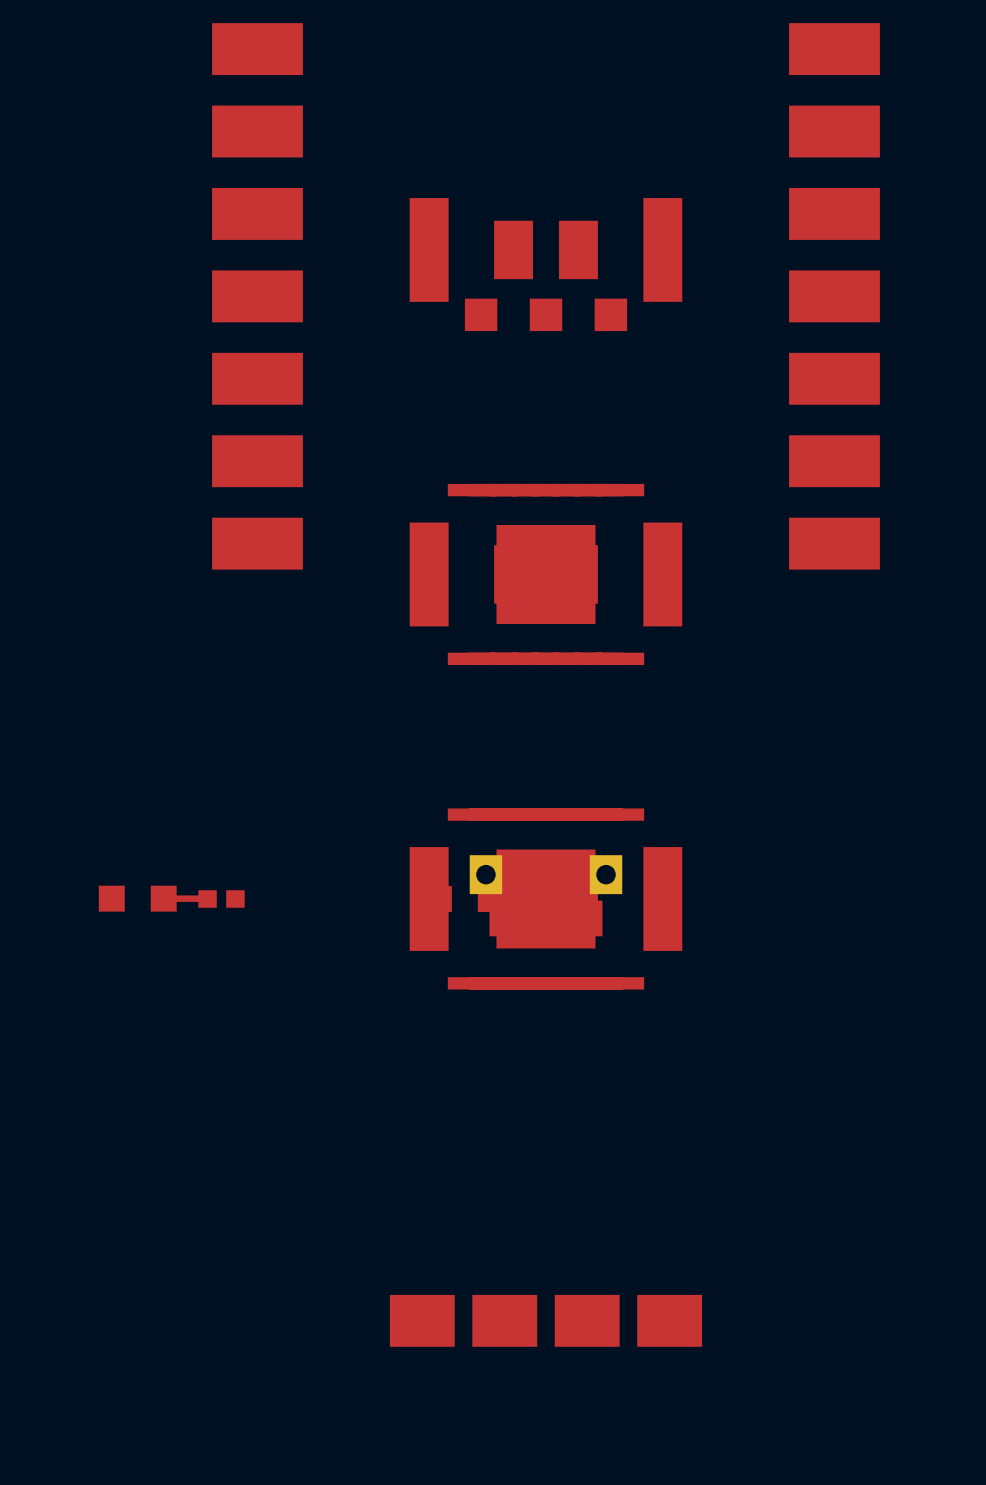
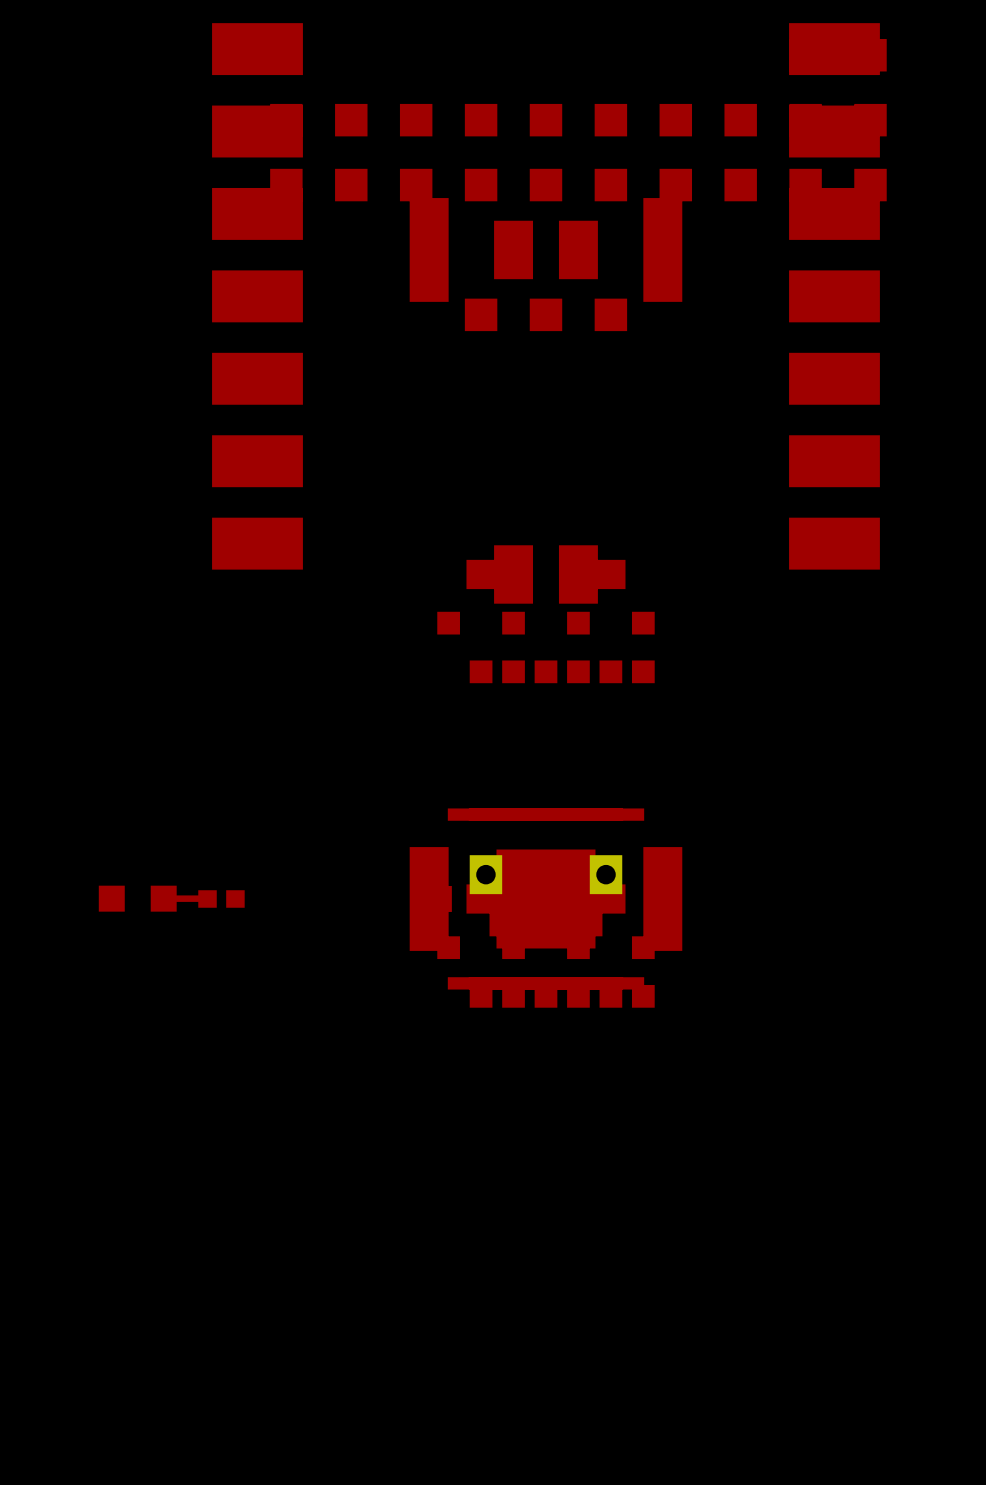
part: none -> (578, 120)
part: (545, 574) -> none
part: (545, 574) -> none
part: none -> (545, 574)
part: none -> (545, 621)
part: none -> (545, 946)
part: (545, 1320) -> none

